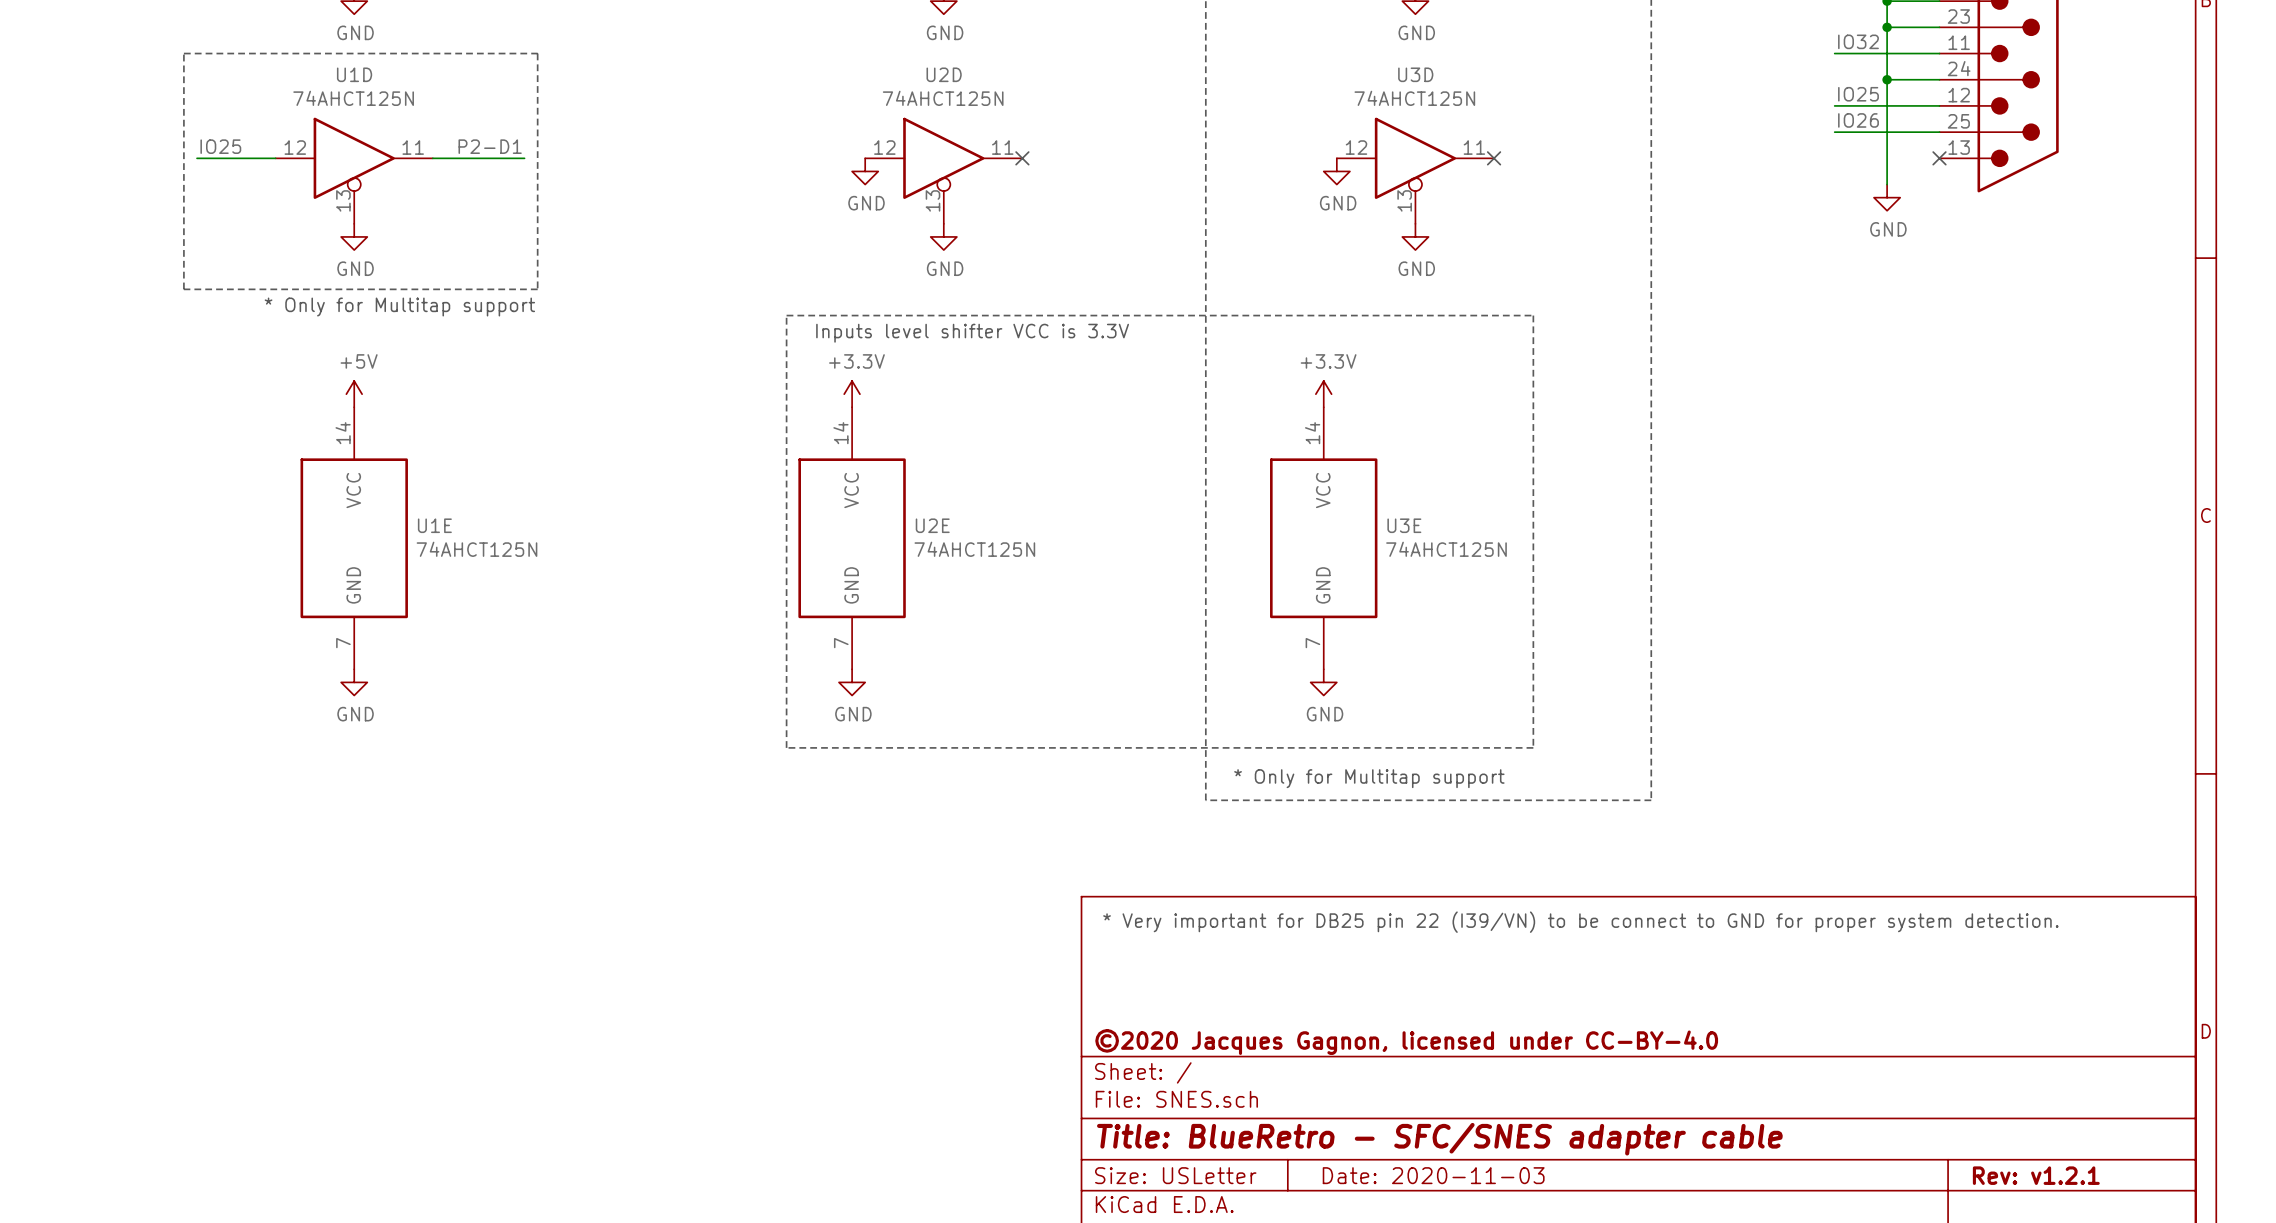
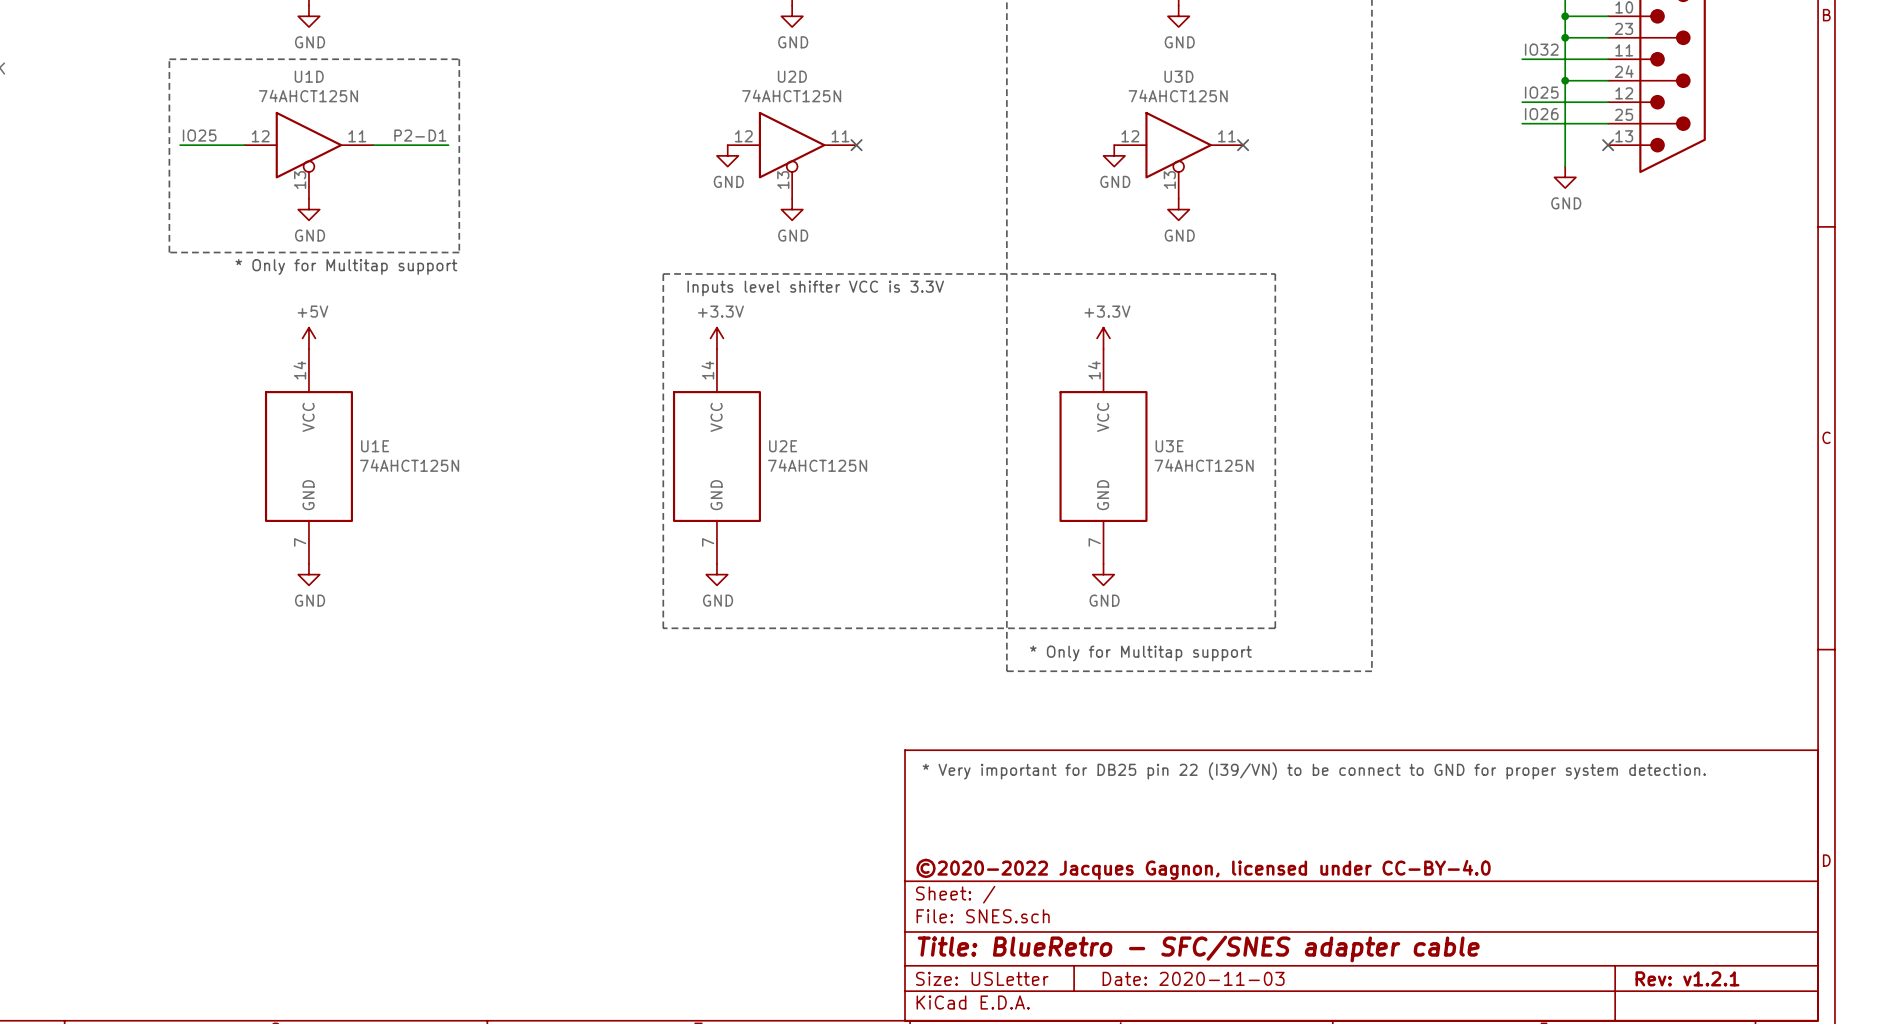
title block: ©2020 Jacques Gagnon, licensed under CC-BY-4.0 (1406, 1041) -> ©2020-2022 Jacques Gagnon, licensed under CC-BY-4.0 (1203, 869)

